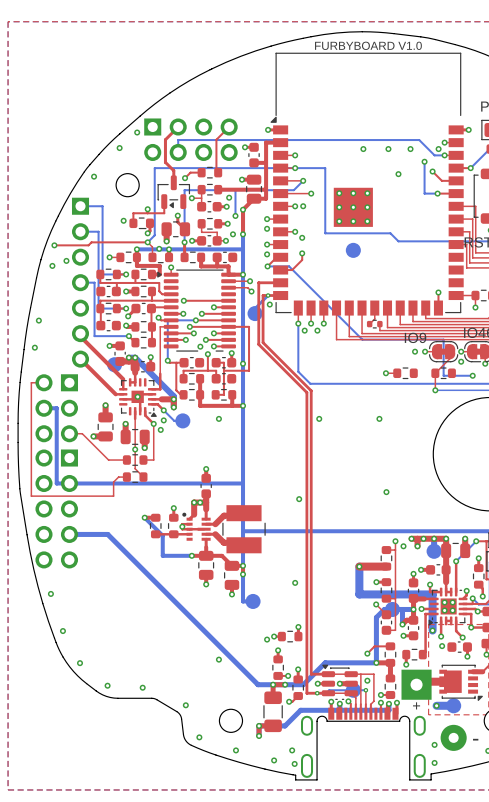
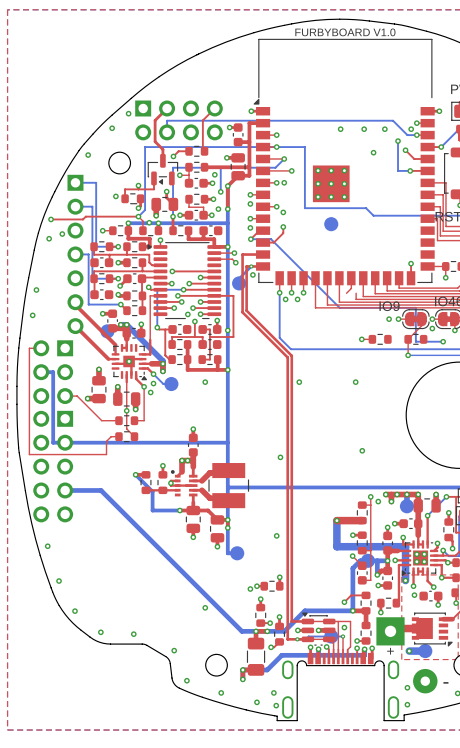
part: (374, 324) -> none

